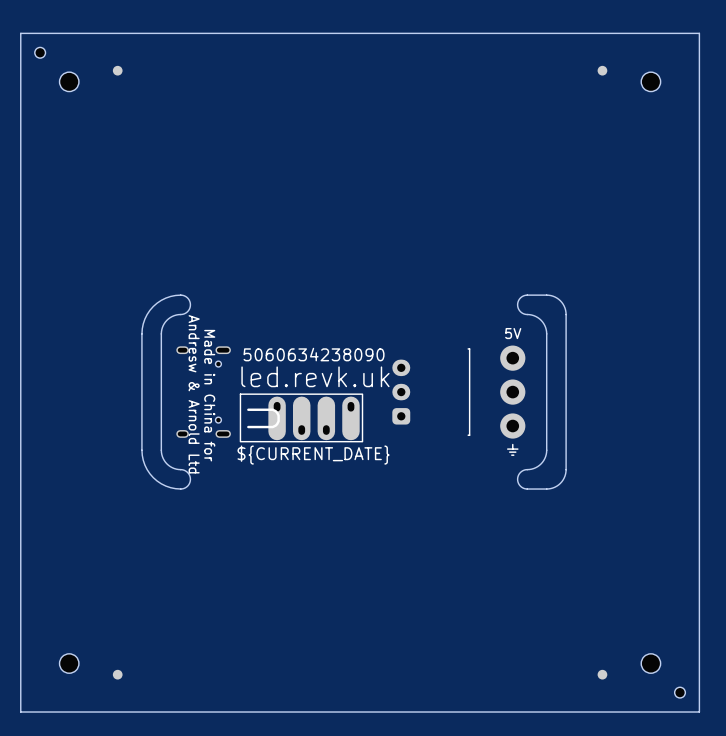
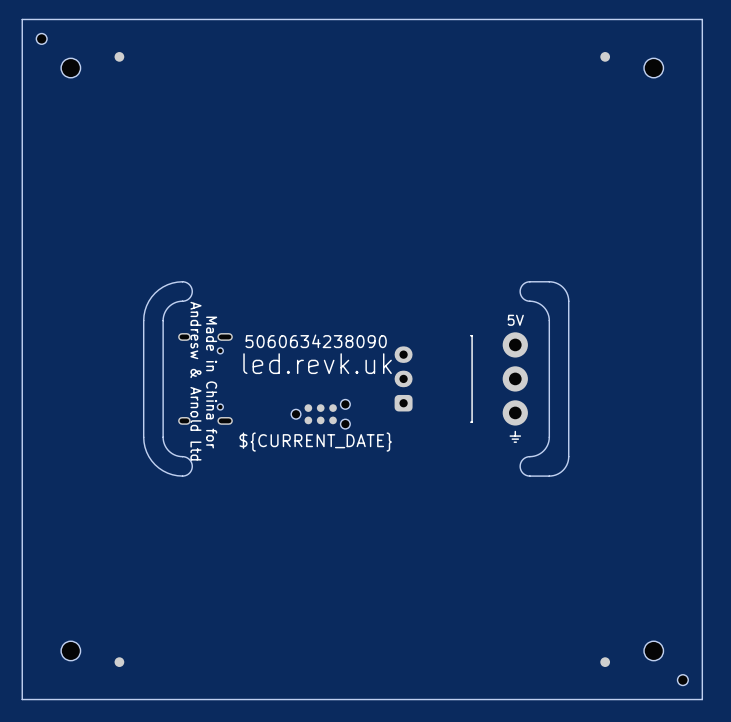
part: (301, 417) -> none
part: none -> (320, 414)

